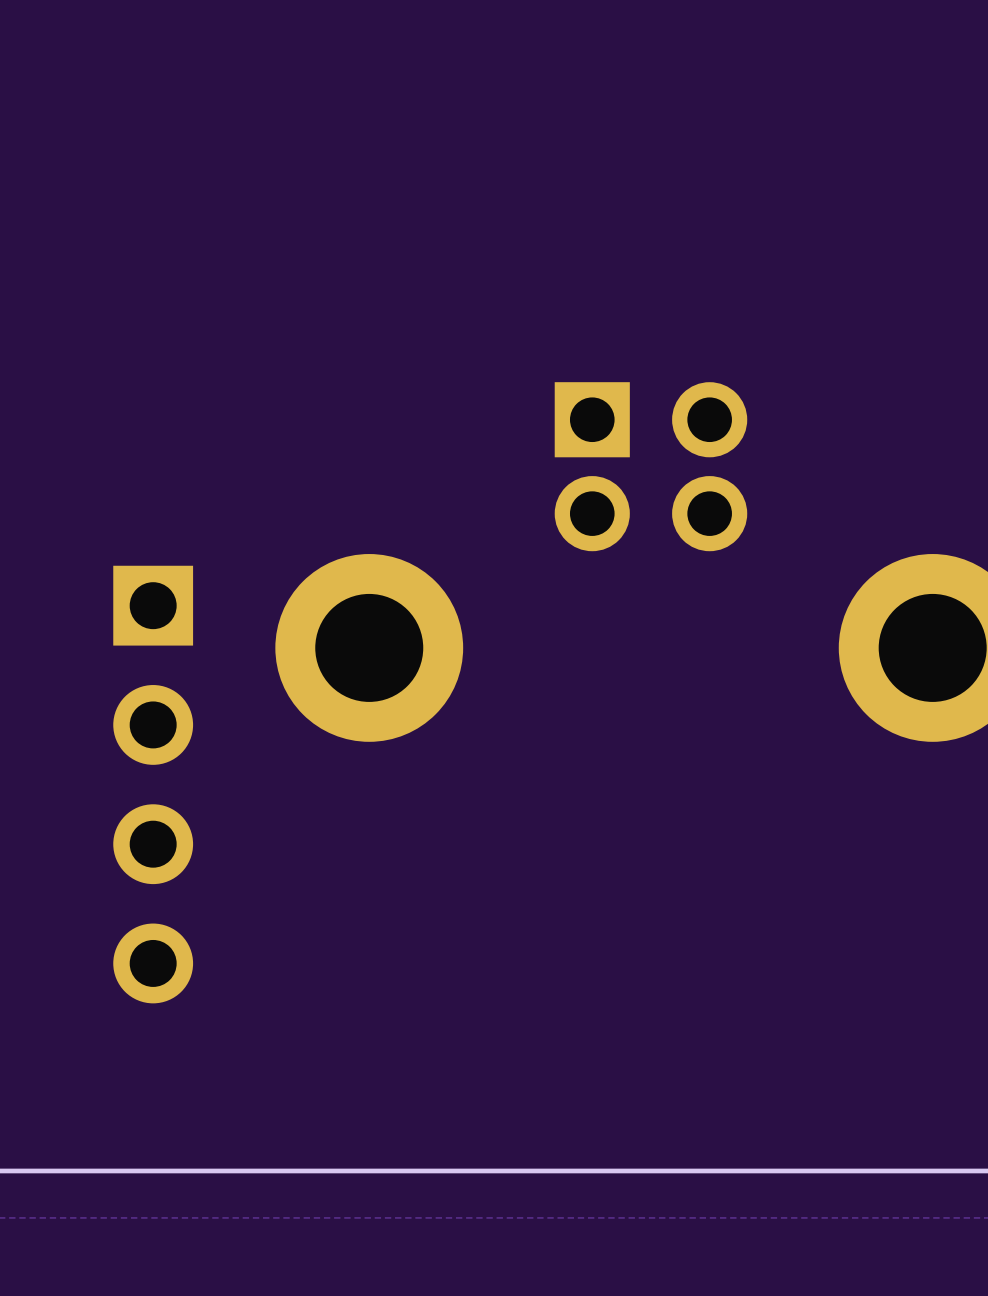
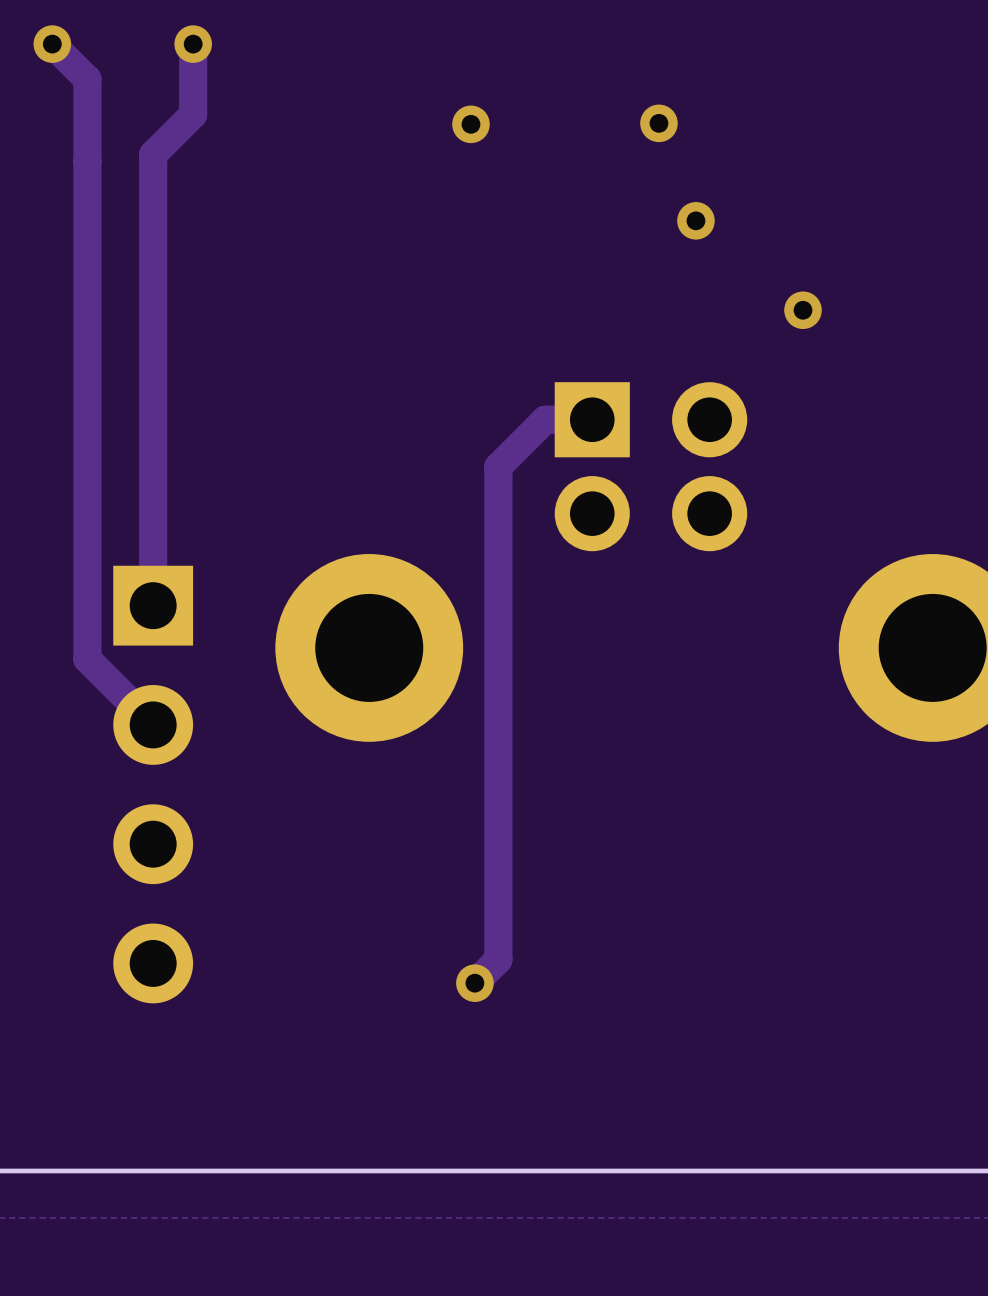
track: none -> (52, 44) (87, 79) (87, 659) (153, 724)
via: none -> (52, 44)
track: none -> (193, 44) (193, 114) (153, 154) (153, 605)
via: none -> (193, 44)
via: none -> (658, 123)
via: none -> (470, 124)
via: none -> (695, 220)
via: none -> (803, 310)
track: none -> (592, 419) (545, 419) (498, 466) (498, 959) (474, 983)
via: none -> (474, 983)

